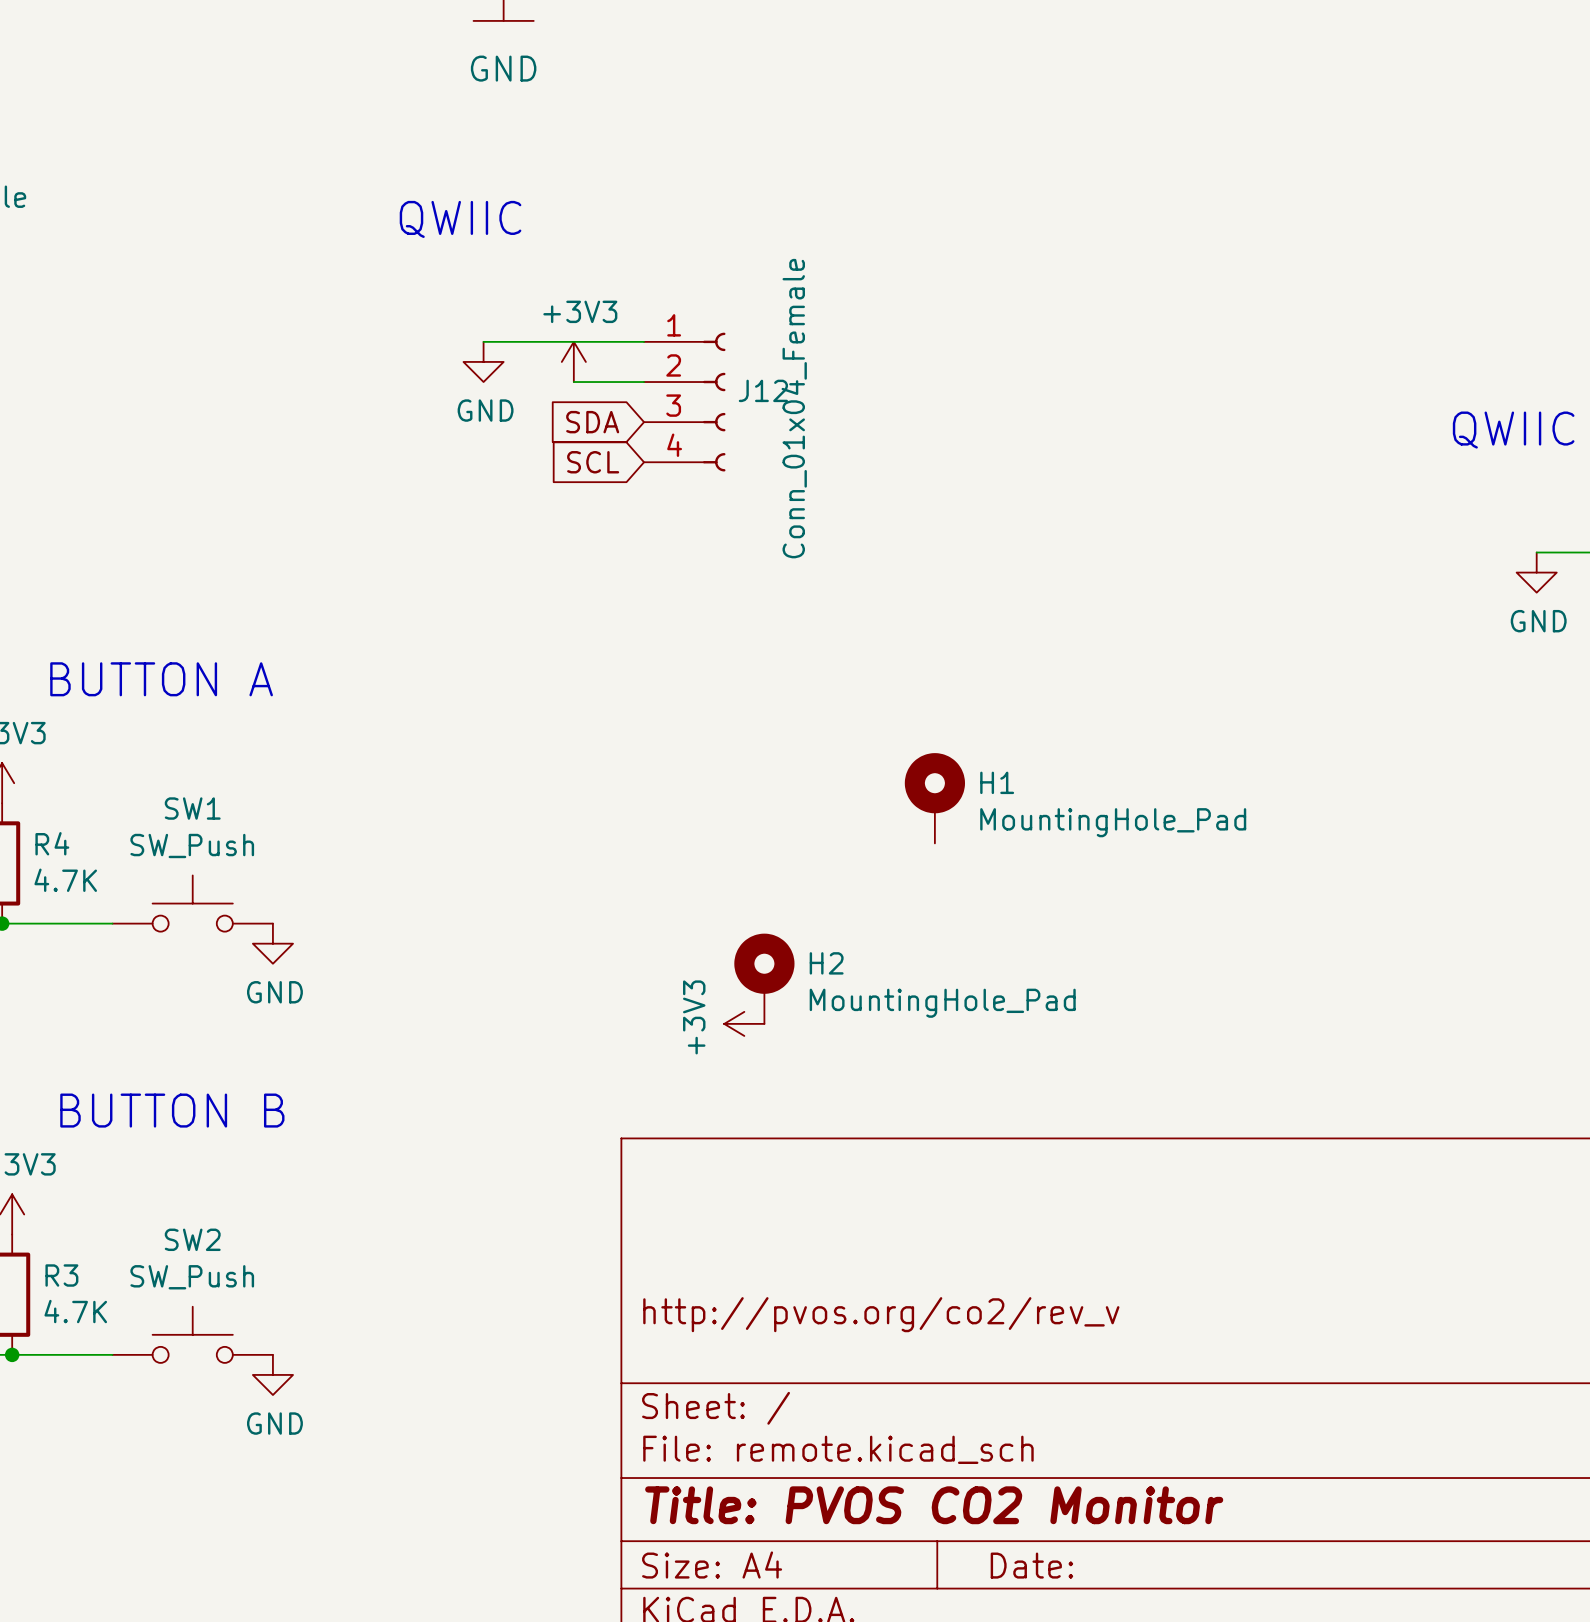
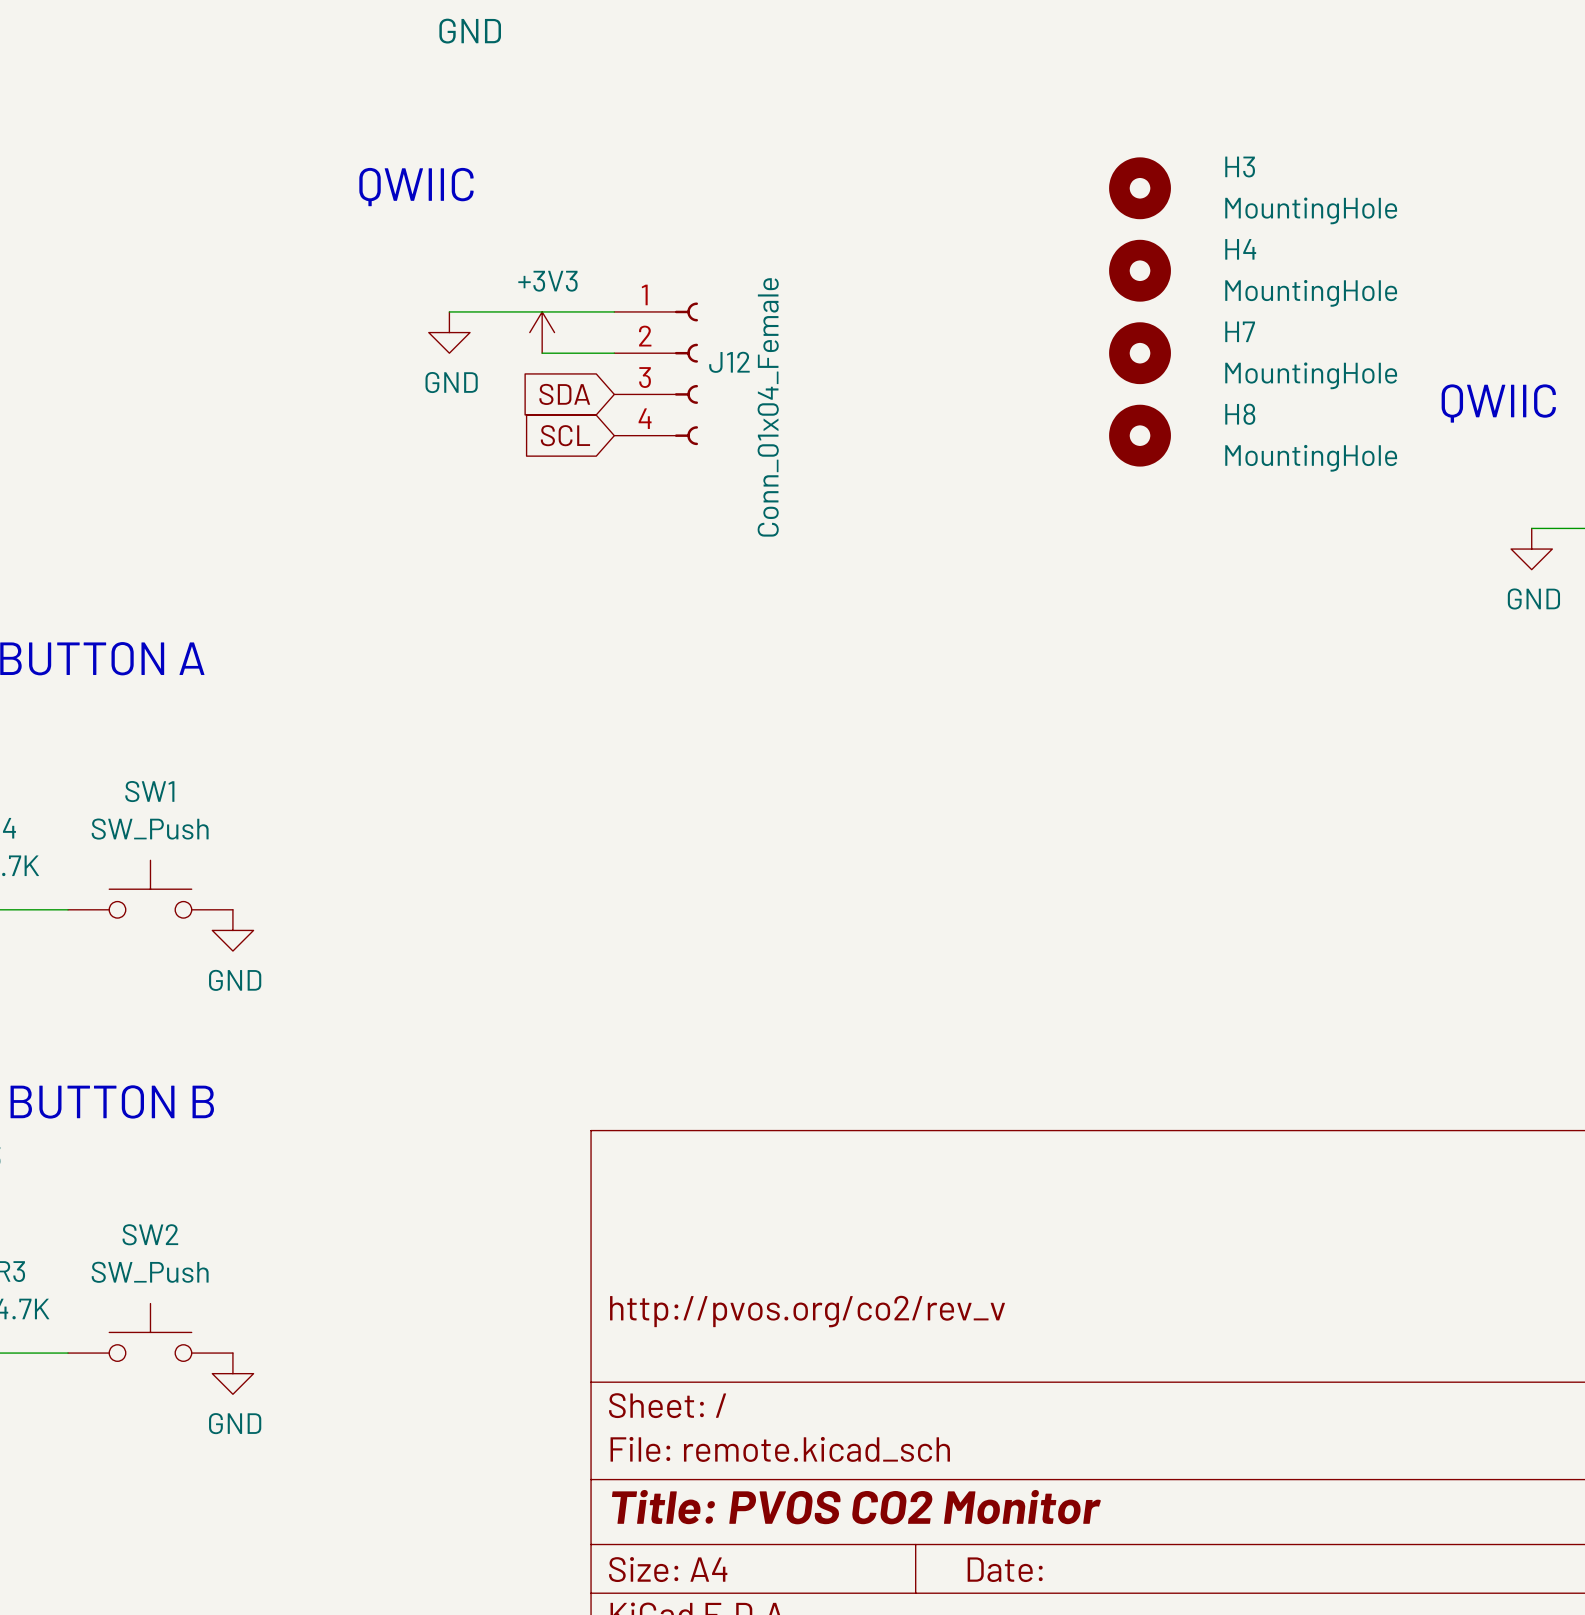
H3: none -> MountingHole (1140, 188)
H4: none -> MountingHole (1140, 270)
H7: none -> MountingHole (1140, 353)
H8: none -> MountingHole (1140, 435)
H1: MountingHole_Pad (934, 798) -> none
H2: MountingHole_Pad (764, 978) -> none
power symbol: +3V3 (744, 1023) -> none

